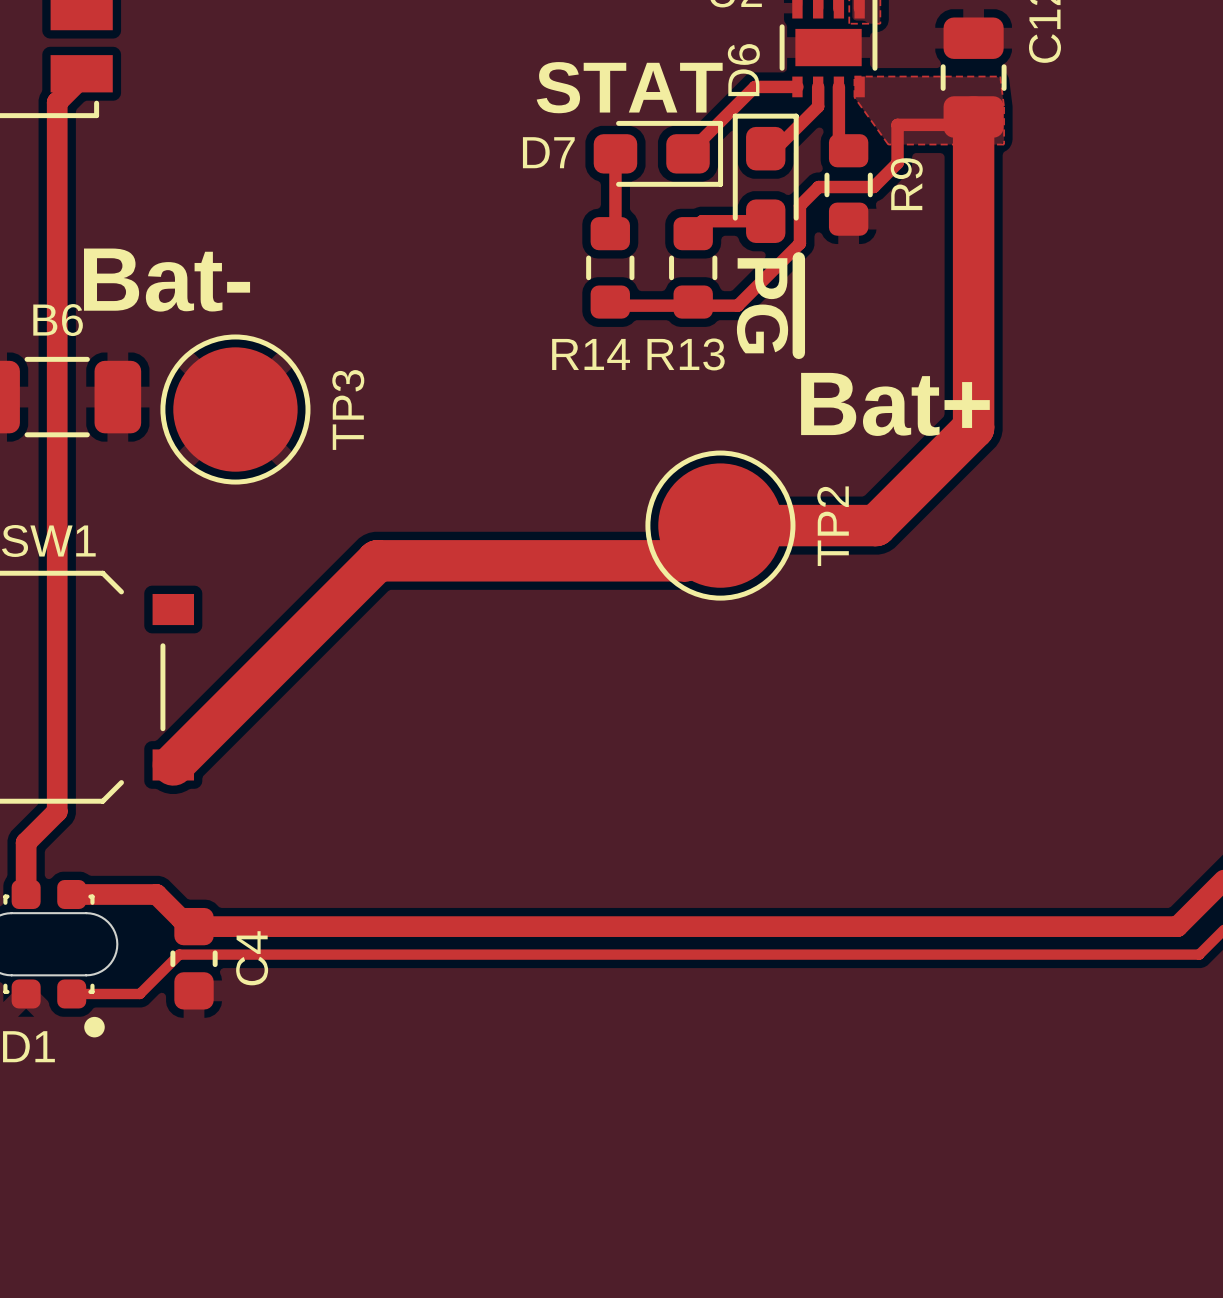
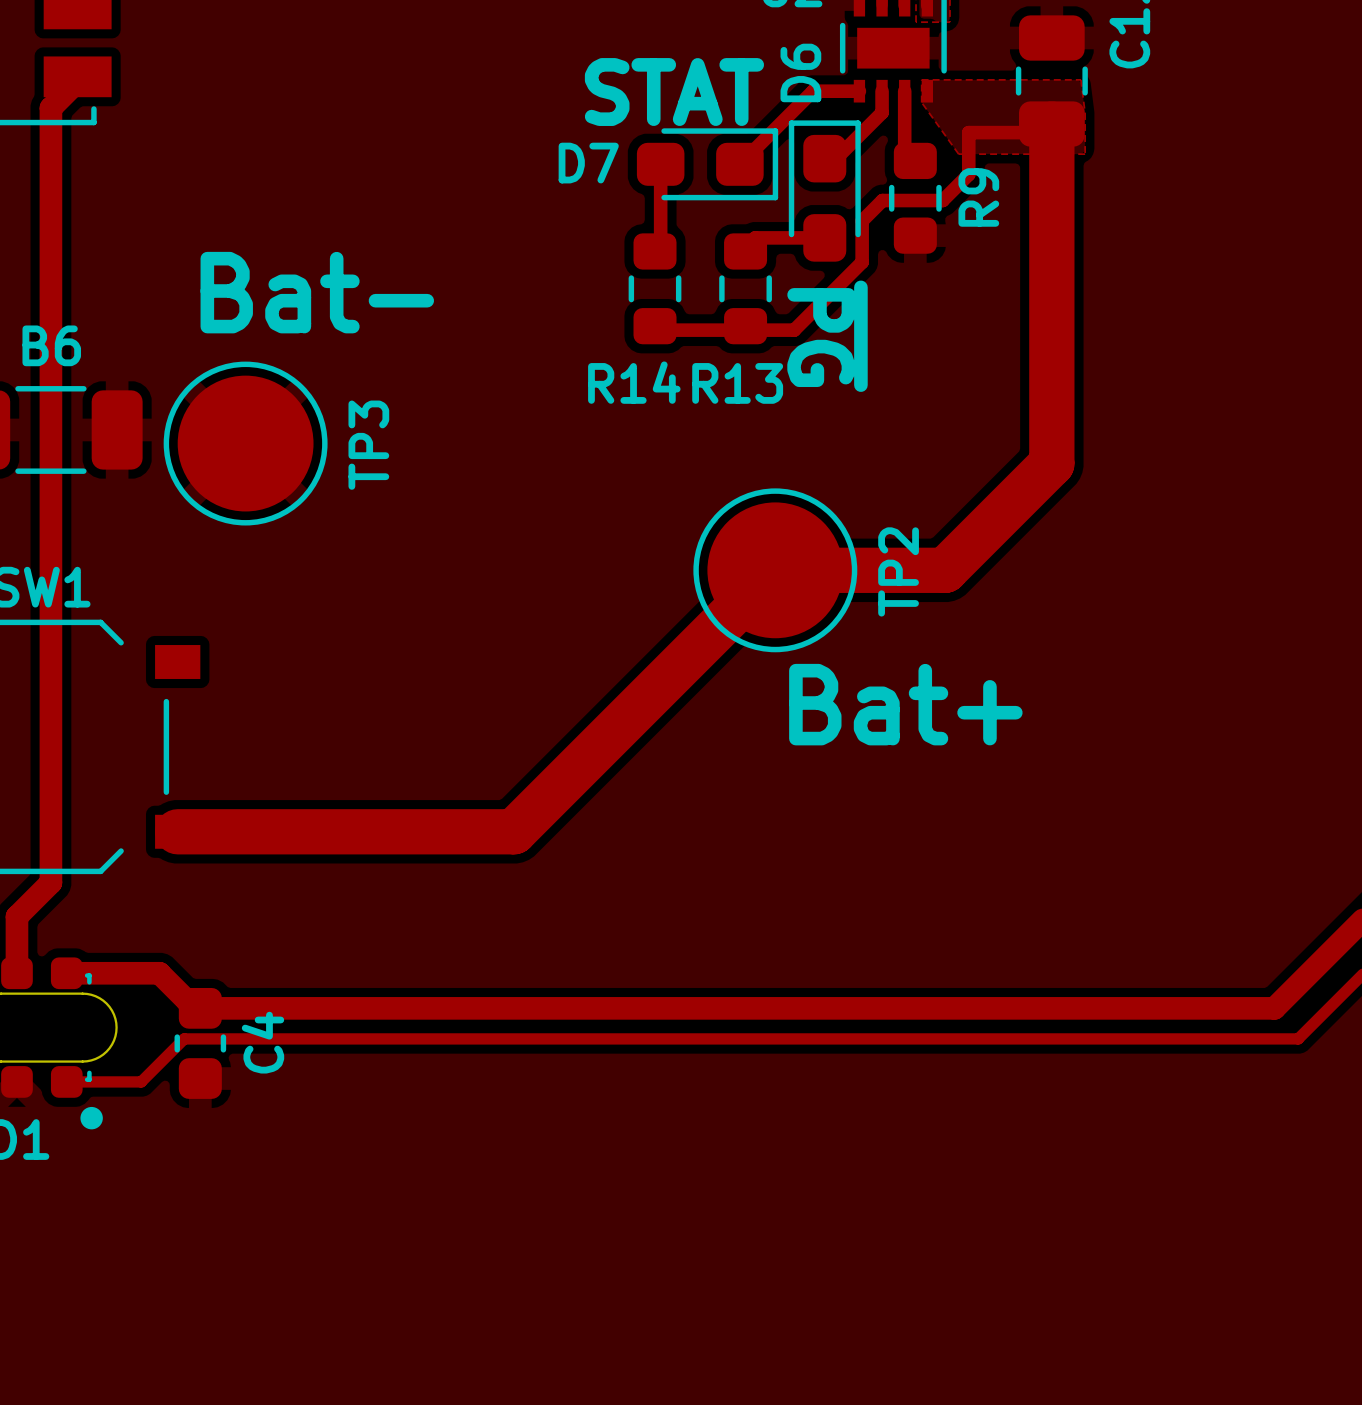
text position: Bat- (167, 280) -> Bat- (317, 292)
text position: Bat+ (895, 404) -> Bat+ (905, 704)
track: (685, 560) (377, 560) (173, 764) -> (736, 608) (513, 831) (177, 831)

